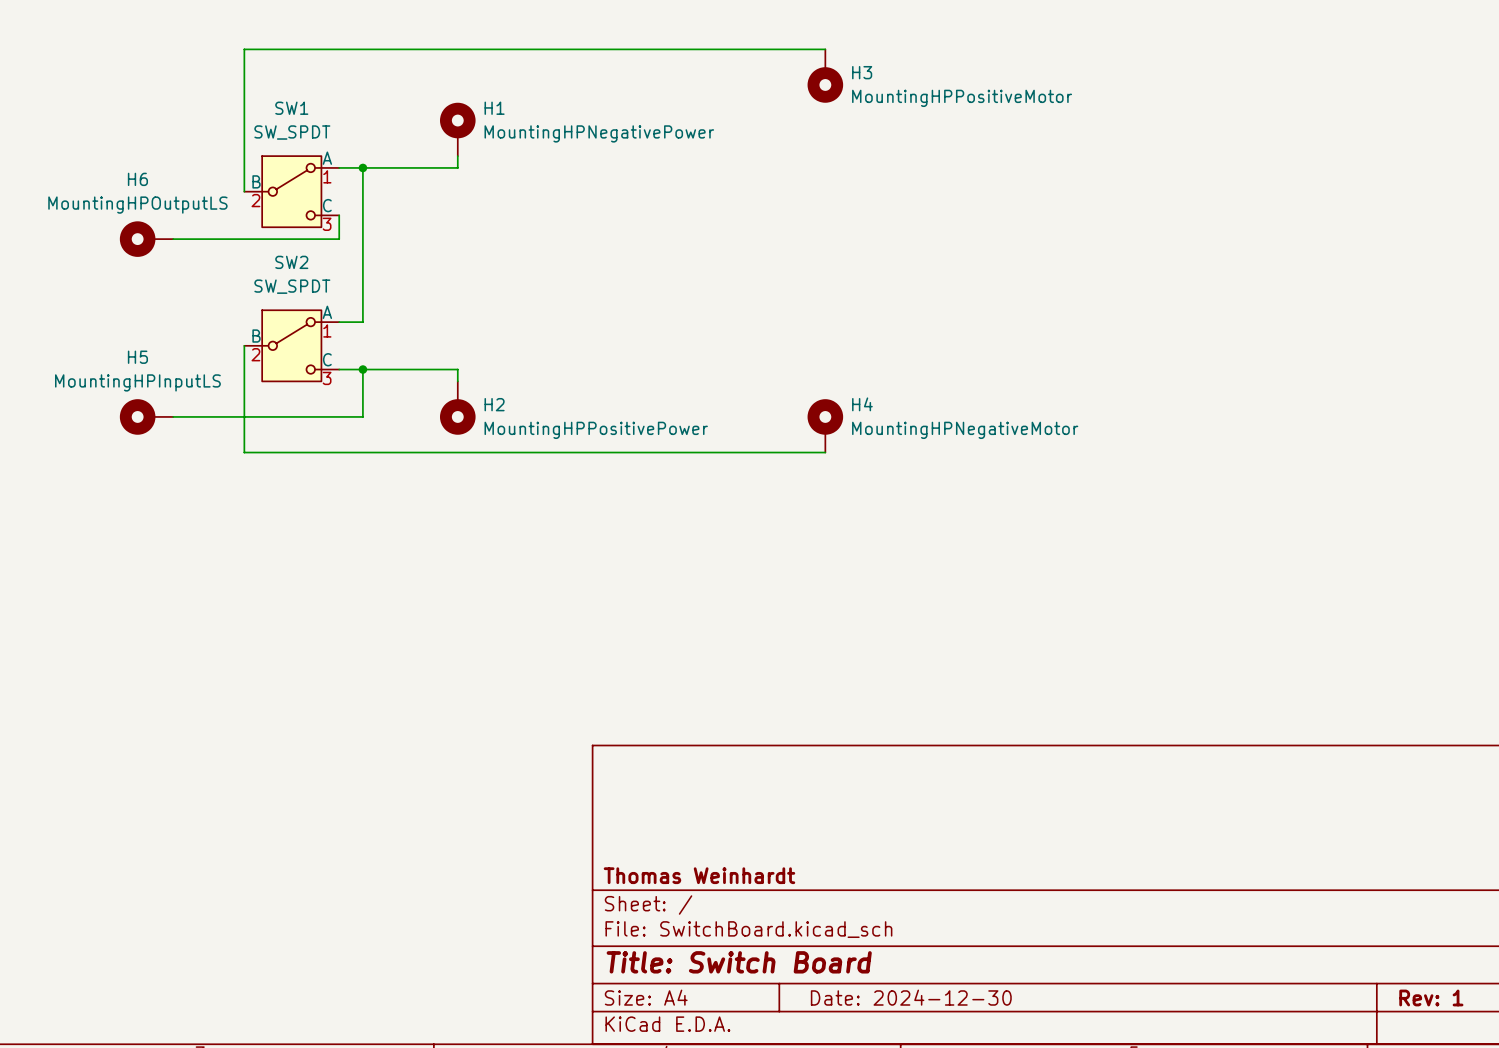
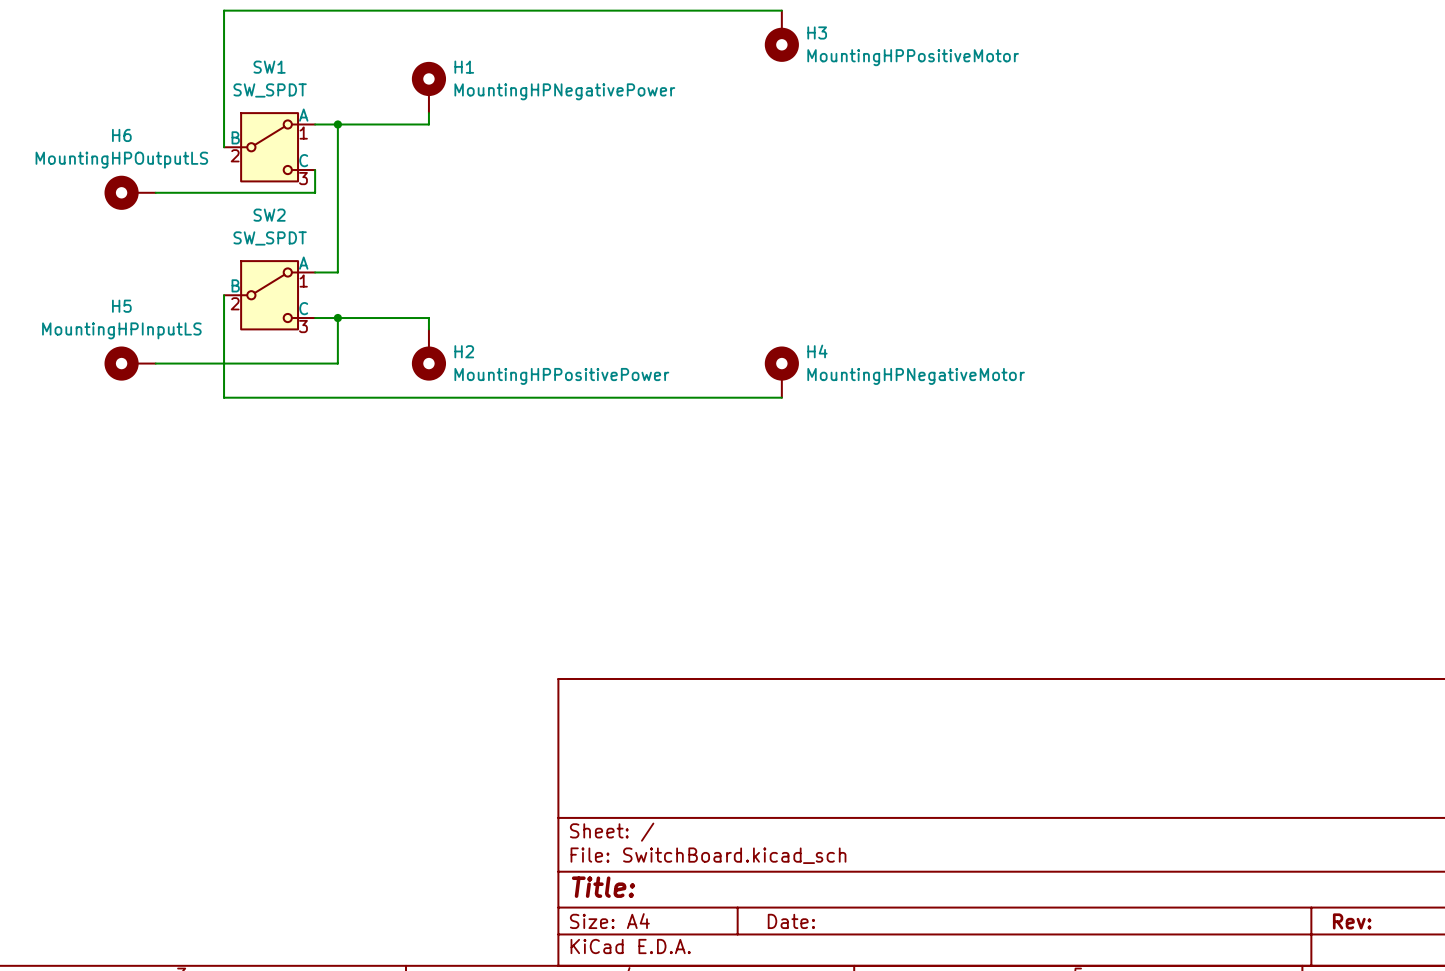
title block: Thomas Weinhardt (699, 875) -> none
title block: Title: Switch Board (739, 962) -> Title: (603, 887)
title block: Date: 2024-12-30 (911, 997) -> Date: (791, 921)
title block: Rev: 1 (1431, 997) -> Rev: (1352, 921)

